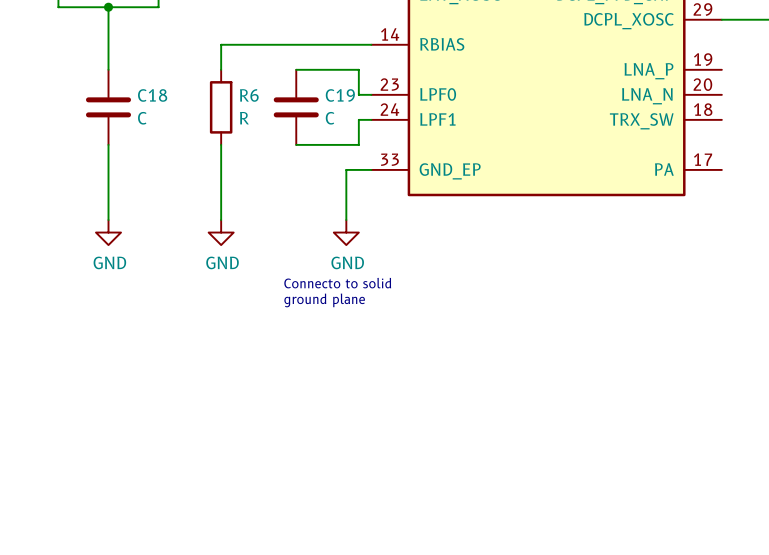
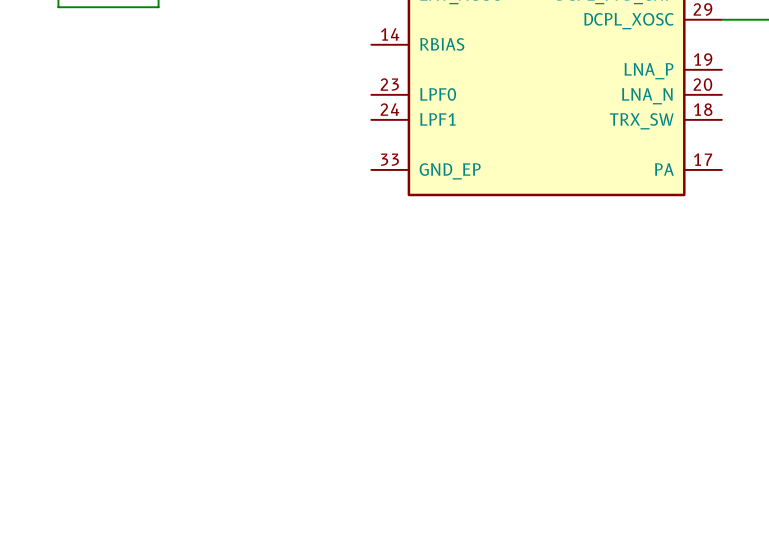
wire: (108, 7) (108, 69) -> none
junction: (108, 7) -> none
wire: (371, 44) (221, 44) (221, 69) -> none
wire: (296, 69) (358, 69) (358, 94) (371, 94) -> none
C18: C (108, 107) -> none
R6: R (221, 107) -> none
C19: C (296, 107) -> none
wire: (371, 119) (358, 119) (358, 144) (296, 144) -> none
wire: (108, 144) (108, 220) -> none
wire: (221, 144) (221, 220) -> none
wire: (371, 169) (346, 169) (346, 220) -> none
power symbol: GND (108, 232) -> none
power symbol: GND (221, 232) -> none
power symbol: GND (346, 232) -> none
text: Connecto to solid (337, 283) -> none
text: ground plane (324, 300) -> none

